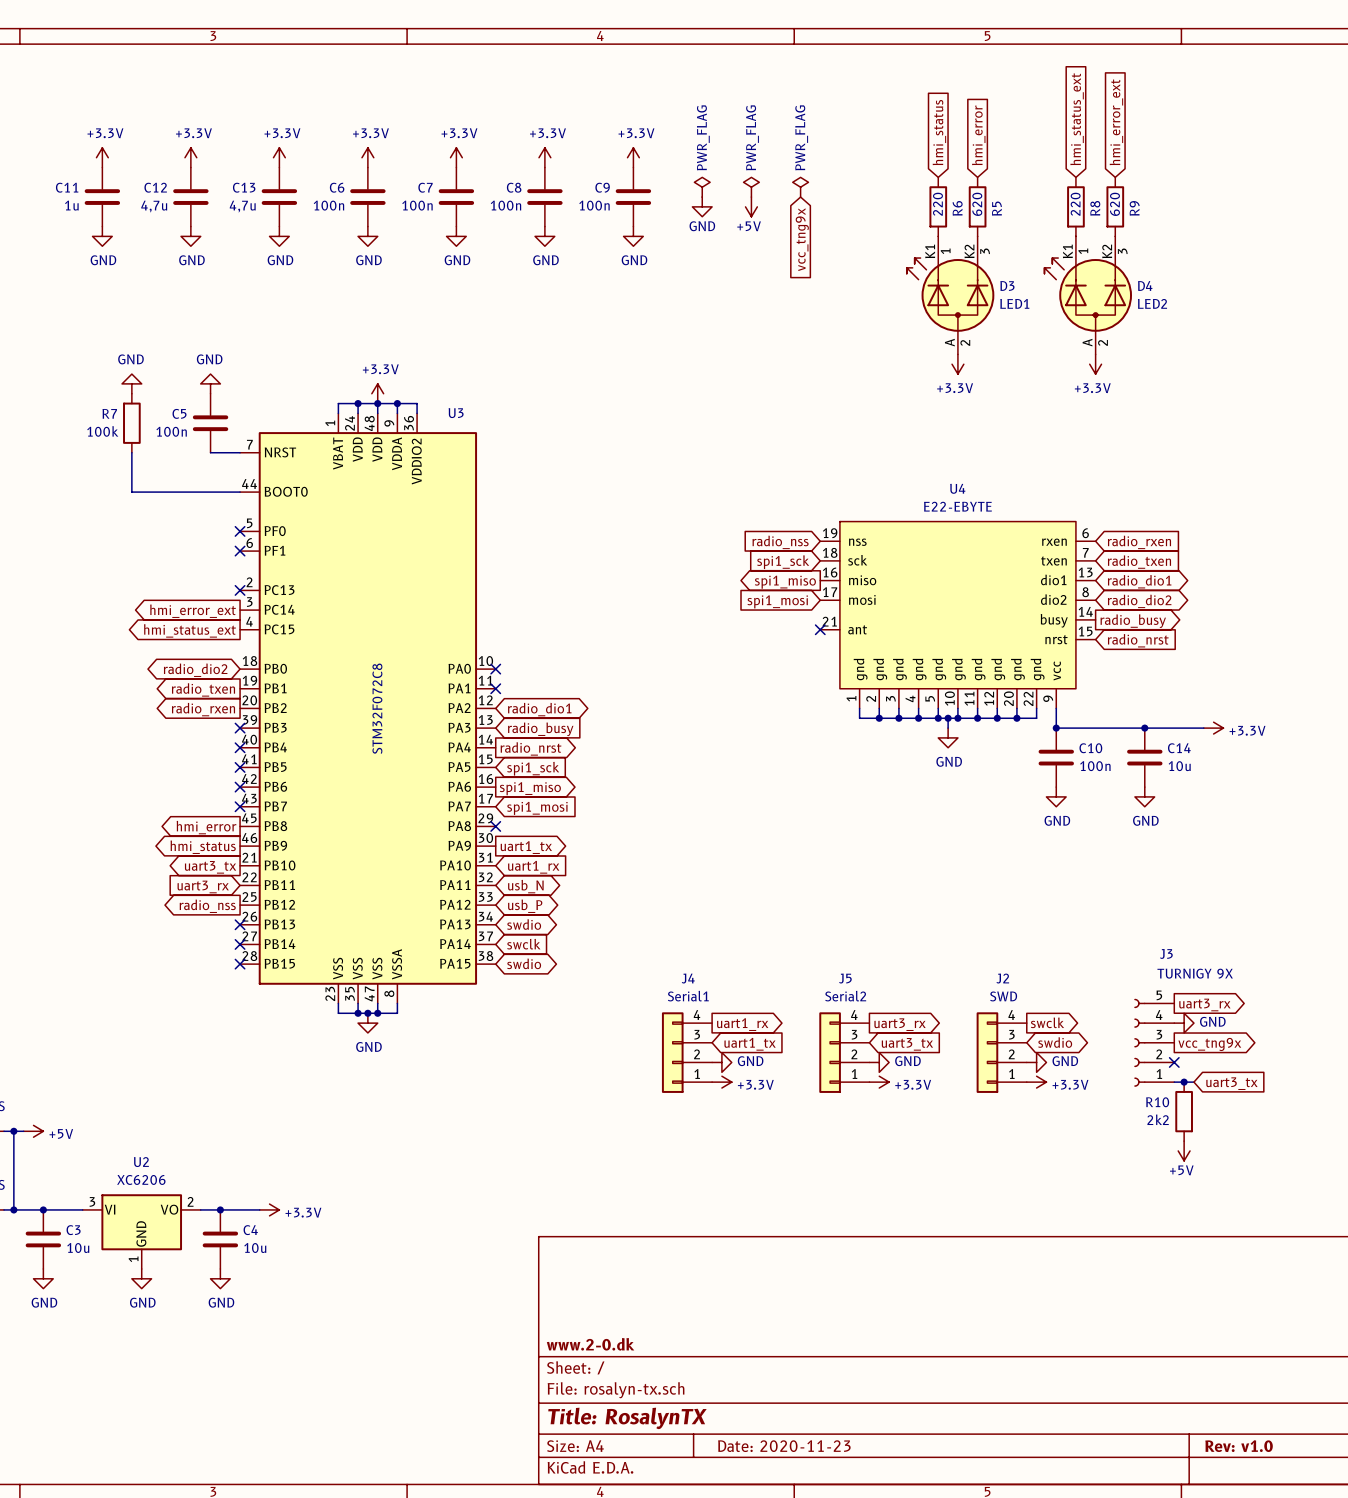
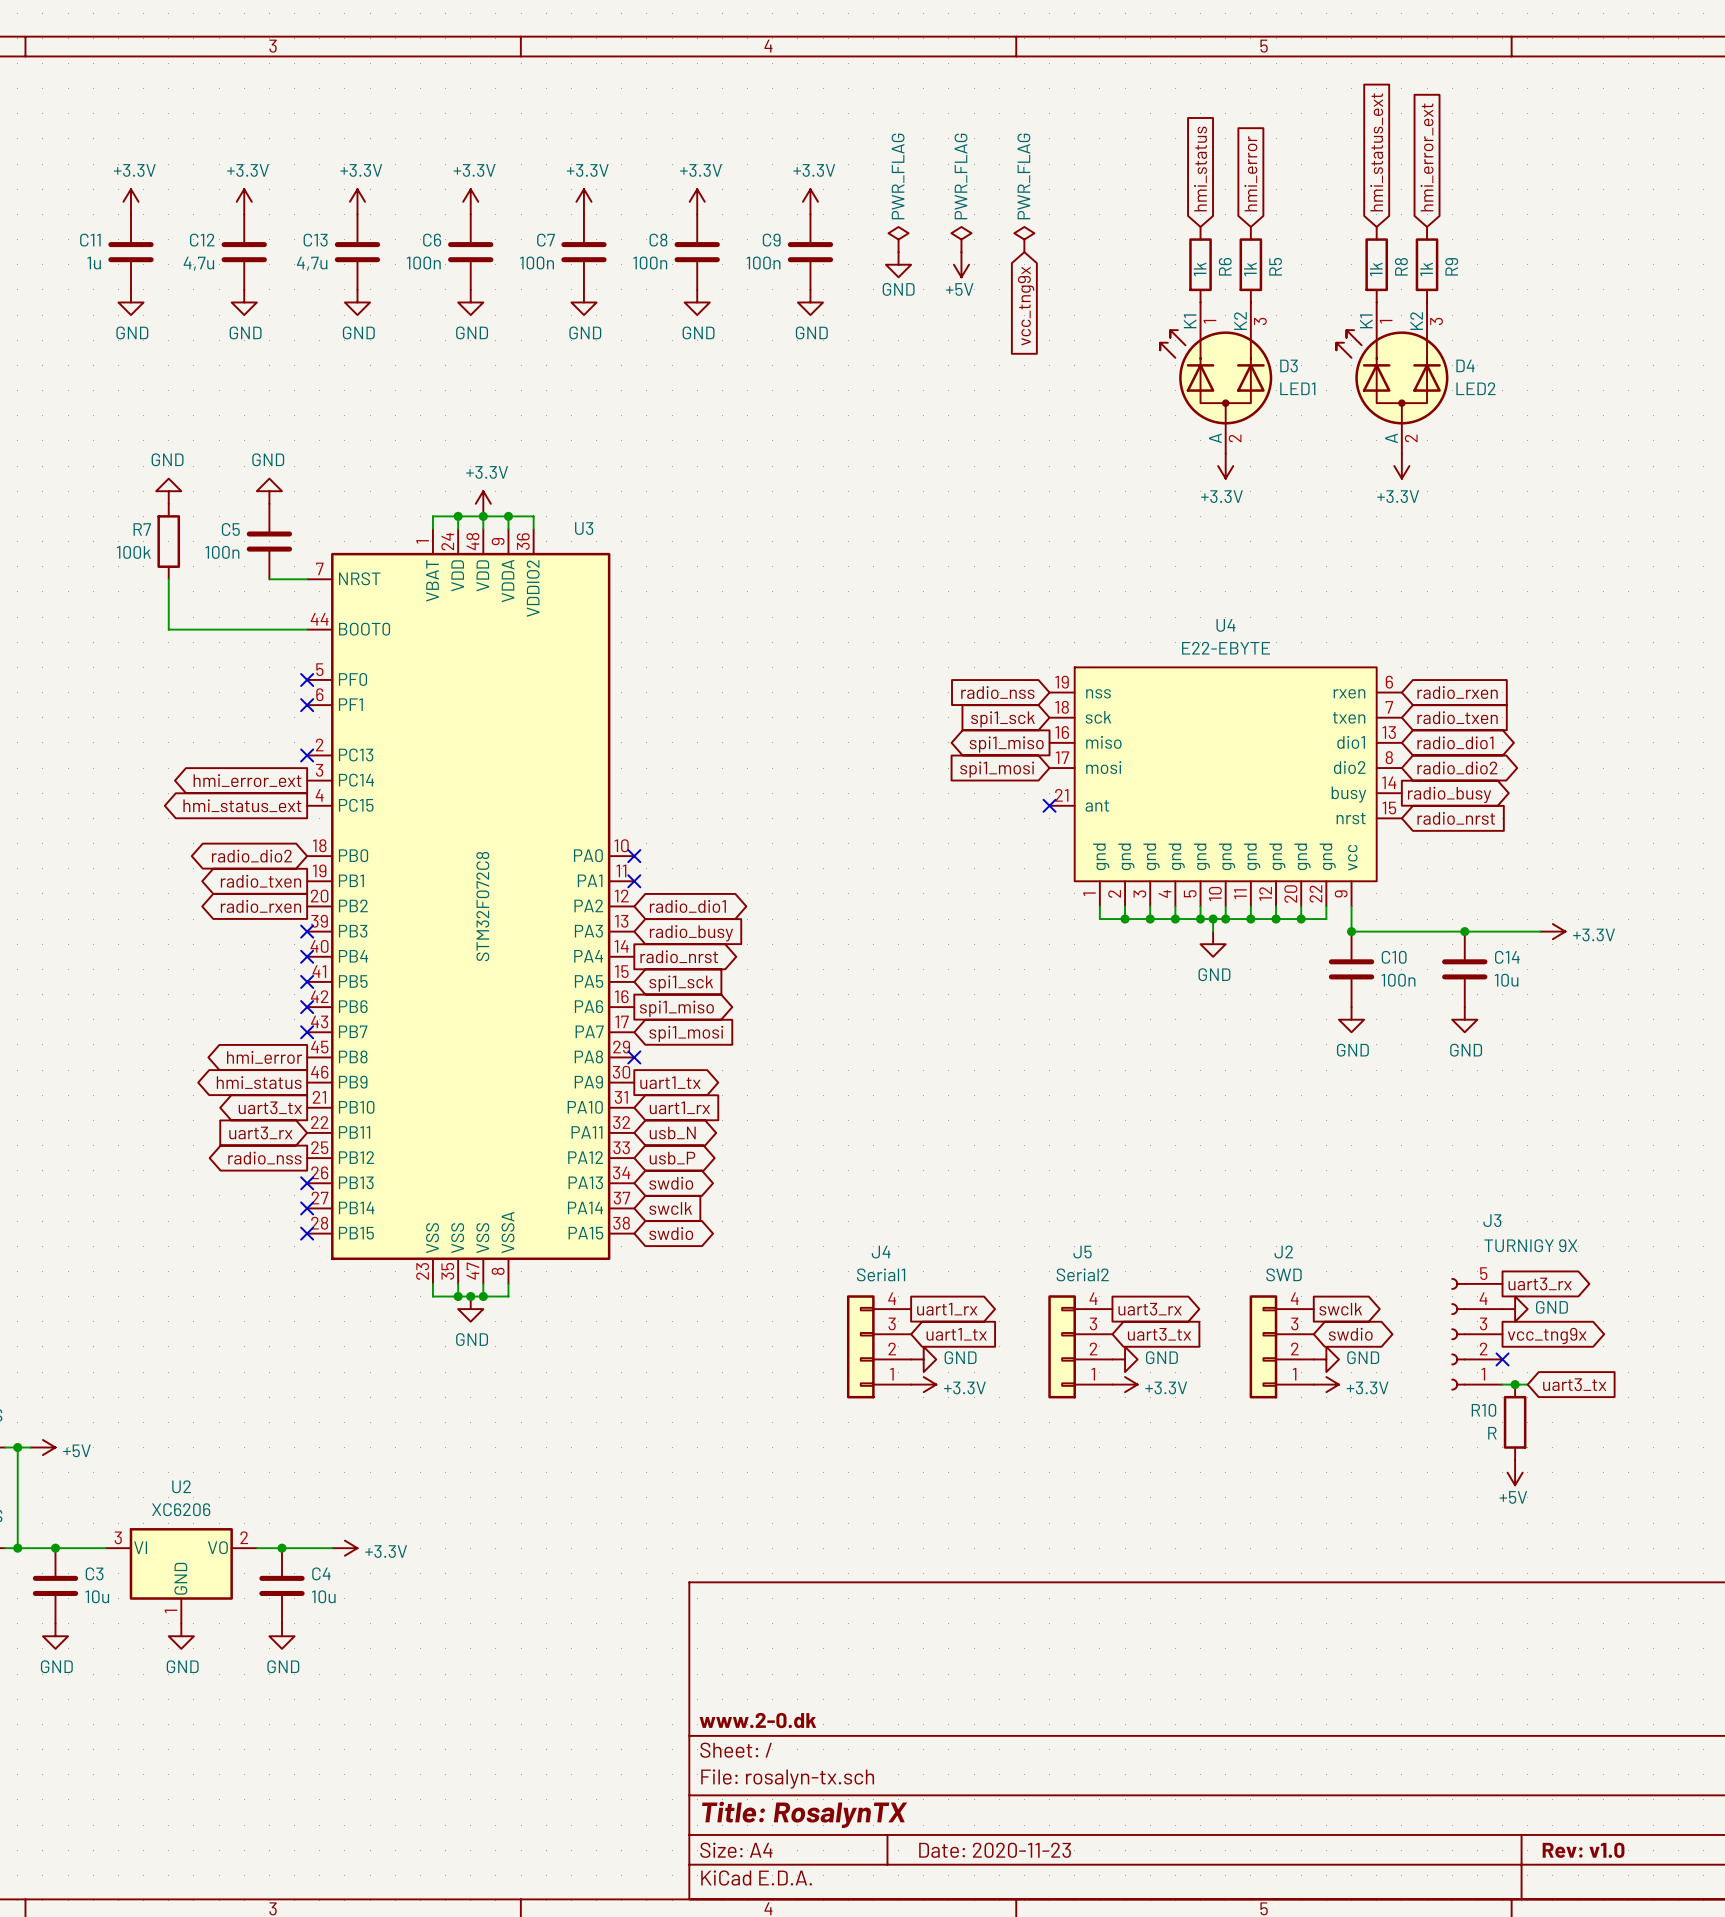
R6 value: 220 (937, 204) -> 1k (1200, 269)
R5 value: 620 (977, 204) -> 1k (1250, 269)
R8 value: 220 (1075, 204) -> 1k (1376, 269)
R9 value: 620 (1114, 204) -> 1k (1426, 269)
R10 value: 2k2 (1158, 1119) -> R (1492, 1433)

